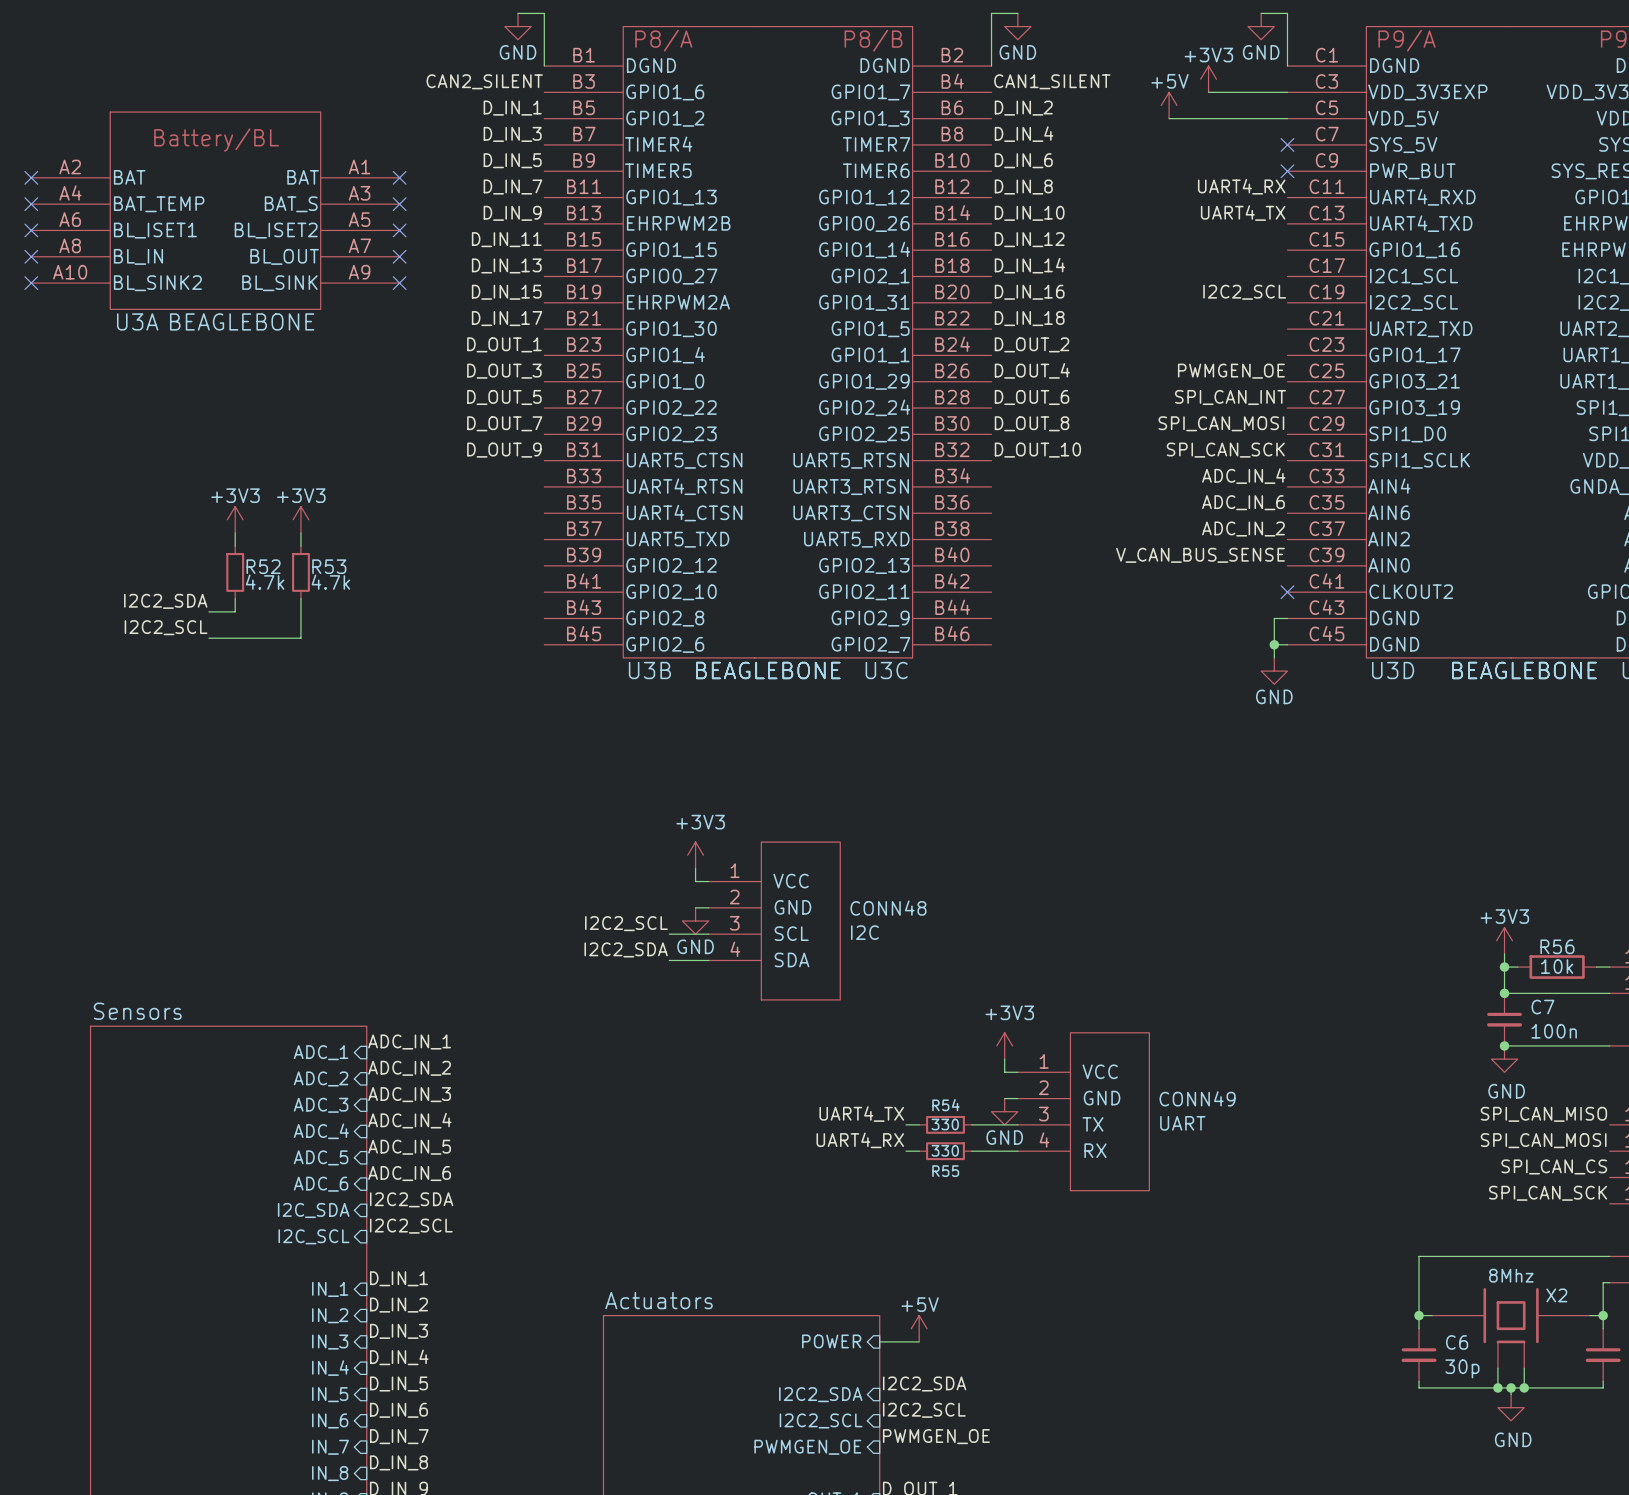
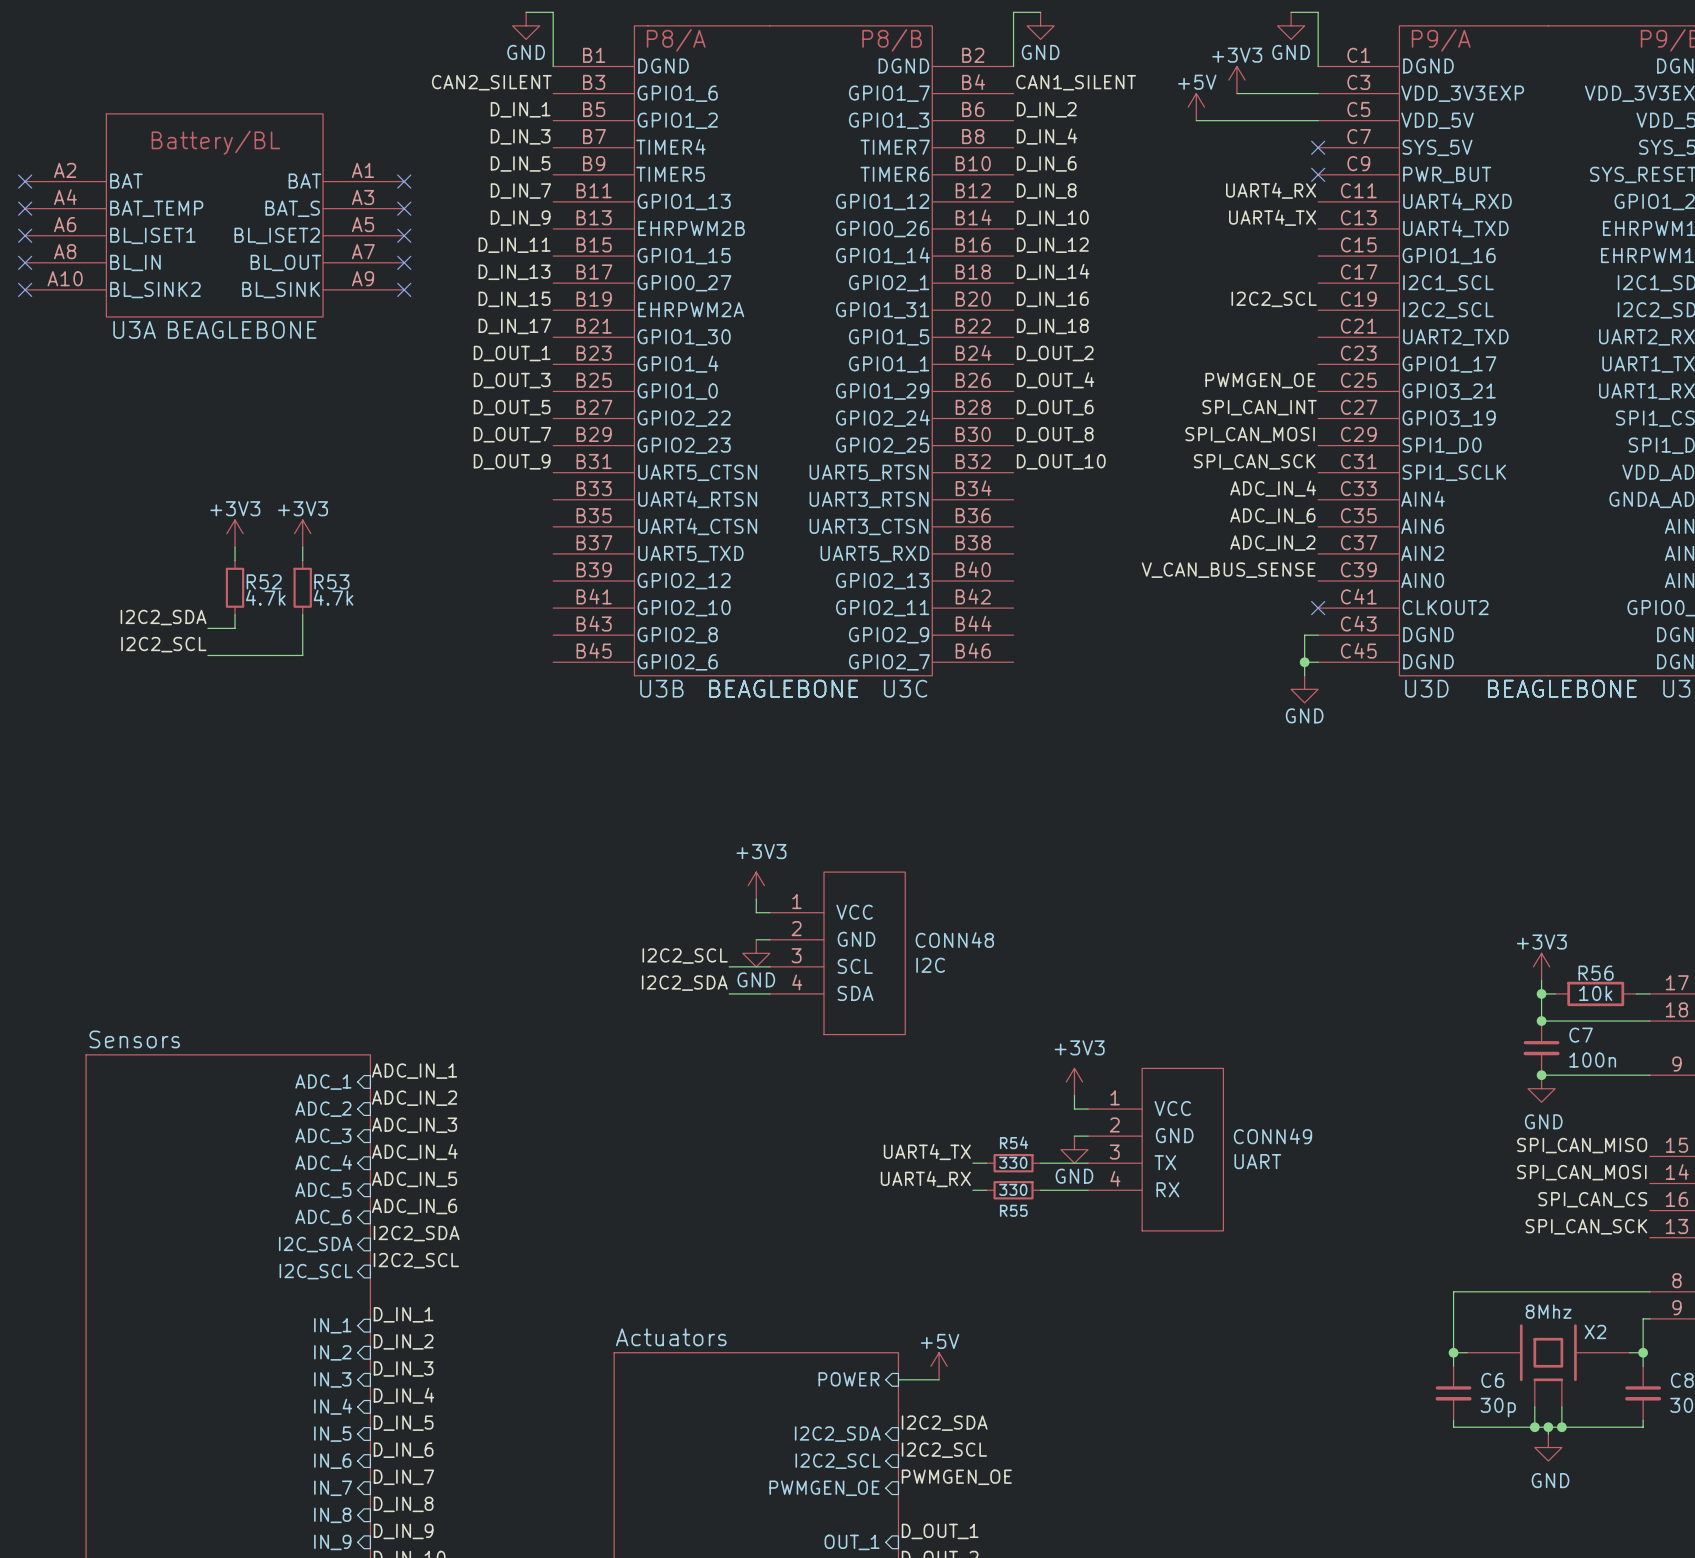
power symbol position: +3V3 (695, 855) -> +3V3 (756, 885)
wire: (695, 868) (695, 881) (708, 881) -> (756, 899) (756, 912) (769, 912)
wire: (695, 907) (708, 907) -> (756, 939) (769, 939)
power symbol position: GND (695, 921) -> GND (756, 953)
CONN48 position: (774, 921) -> (837, 953)
label position: I2C2_SCL (626, 923) -> I2C2_SCL (685, 956)
wire: (669, 934) (708, 934) -> (729, 966) (769, 966)
label position: I2C2_SDA (626, 949) -> I2C2_SDA (684, 983)
wire: (669, 960) (708, 960) -> (729, 993) (769, 993)
power symbol position: +3V3 (1004, 1045) -> +3V3 (1074, 1081)
wire: (1004, 1059) (1004, 1072) (1017, 1072) -> (1074, 1095) (1074, 1109) (1088, 1109)
wire: (1004, 1098) (1017, 1098) -> (1074, 1136) (1088, 1136)
power symbol position: GND (1004, 1111) -> GND (1074, 1149)
CONN49 position: (1083, 1111) -> (1155, 1149)
label position: UART4_TX (861, 1114) -> UART4_TX (927, 1152)
wire: (906, 1124) (919, 1124) -> (972, 1163) (986, 1163)
R54 position: (945, 1124) -> (1013, 1163)
wire: (971, 1124) (1017, 1124) -> (1040, 1163) (1088, 1163)
label position: UART4_RX (860, 1140) -> UART4_RX (925, 1179)
wire: (906, 1151) (919, 1151) -> (972, 1190) (986, 1190)
R55 position: (945, 1151) -> (1013, 1190)
wire: (971, 1151) (1017, 1151) -> (1040, 1190) (1088, 1190)

